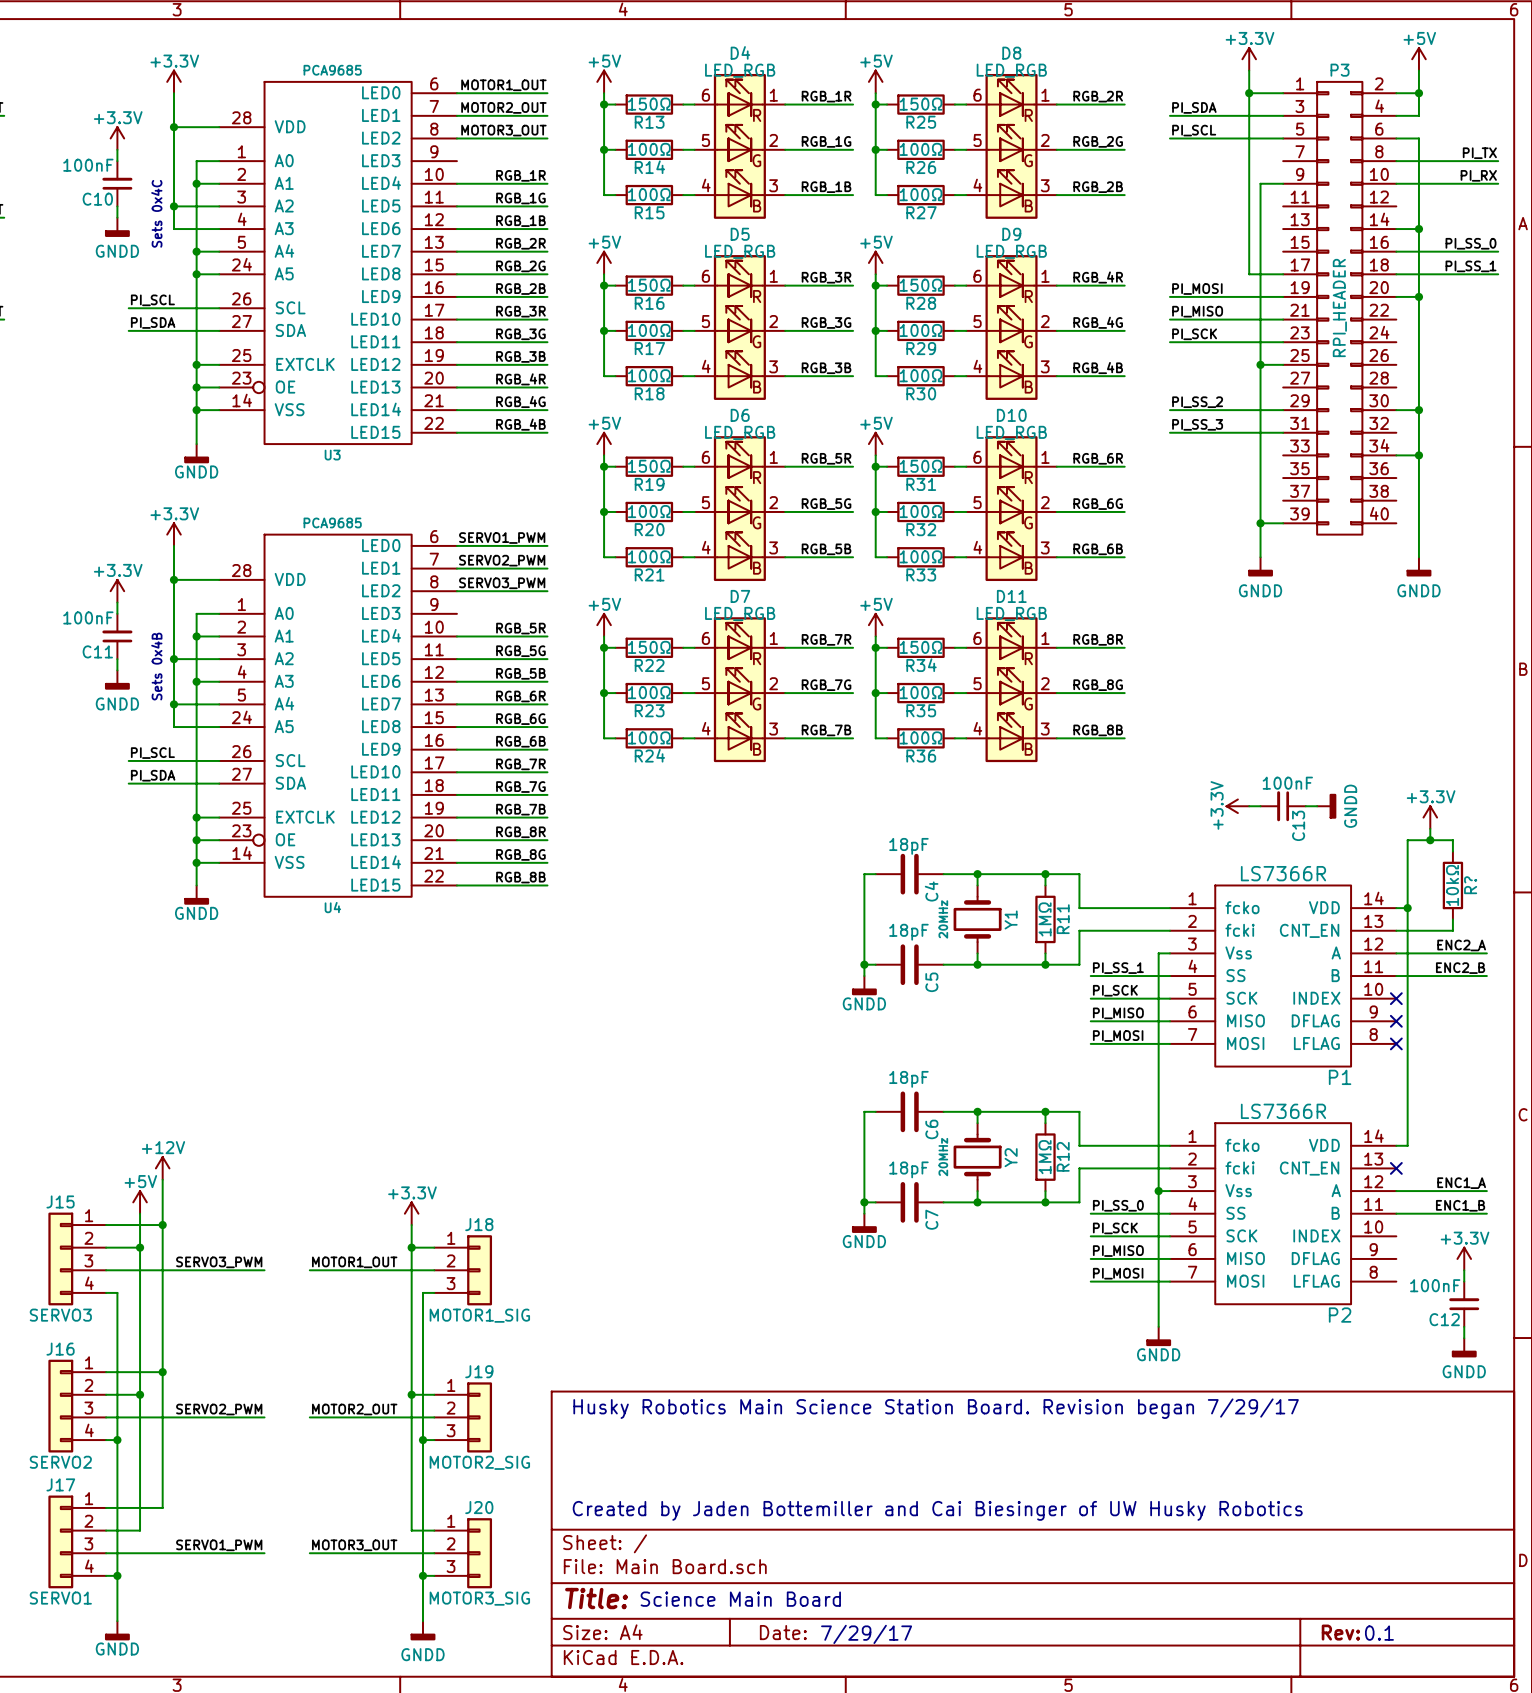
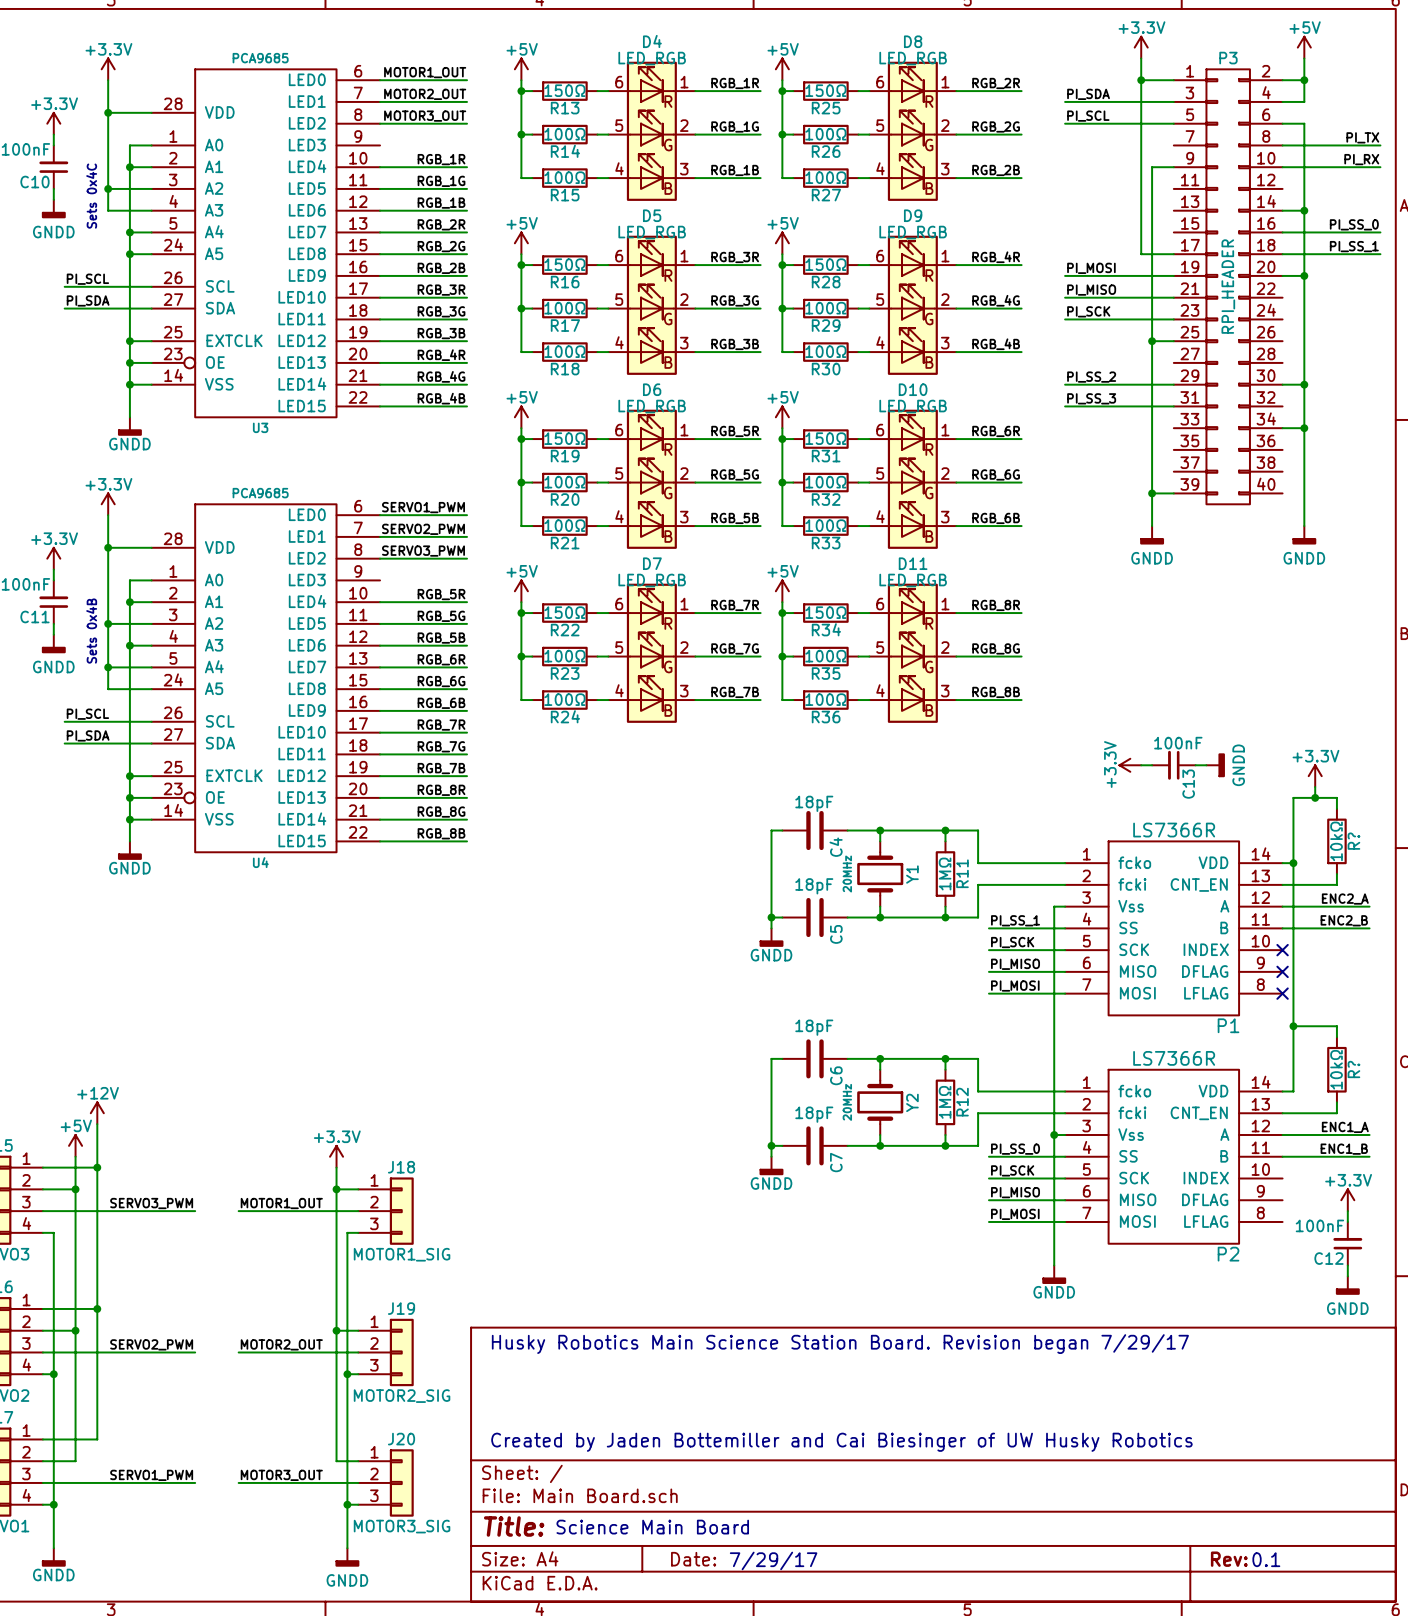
wire: none -> (1293, 1026) (1336, 1026) (1336, 1037)
junction: none -> (1293, 1026)
R?: none -> 10kΩ (1336, 1069)
wire: none -> (1336, 1102) (1336, 1113) (1282, 1113)
no-connect mark: (1396, 1168) -> none

